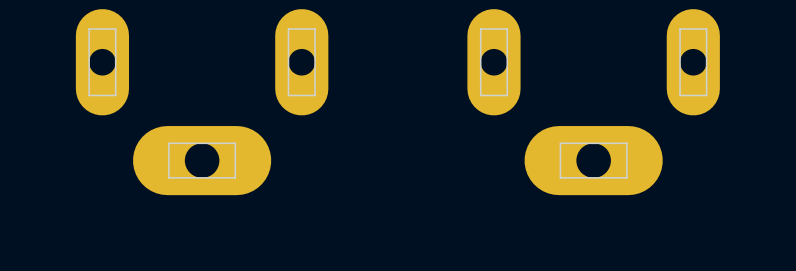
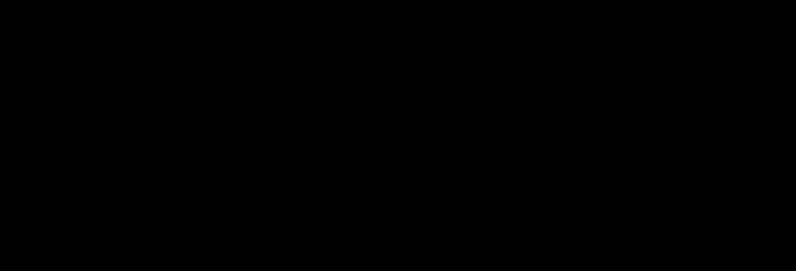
part: (202, 102) -> none
part: (593, 102) -> none

